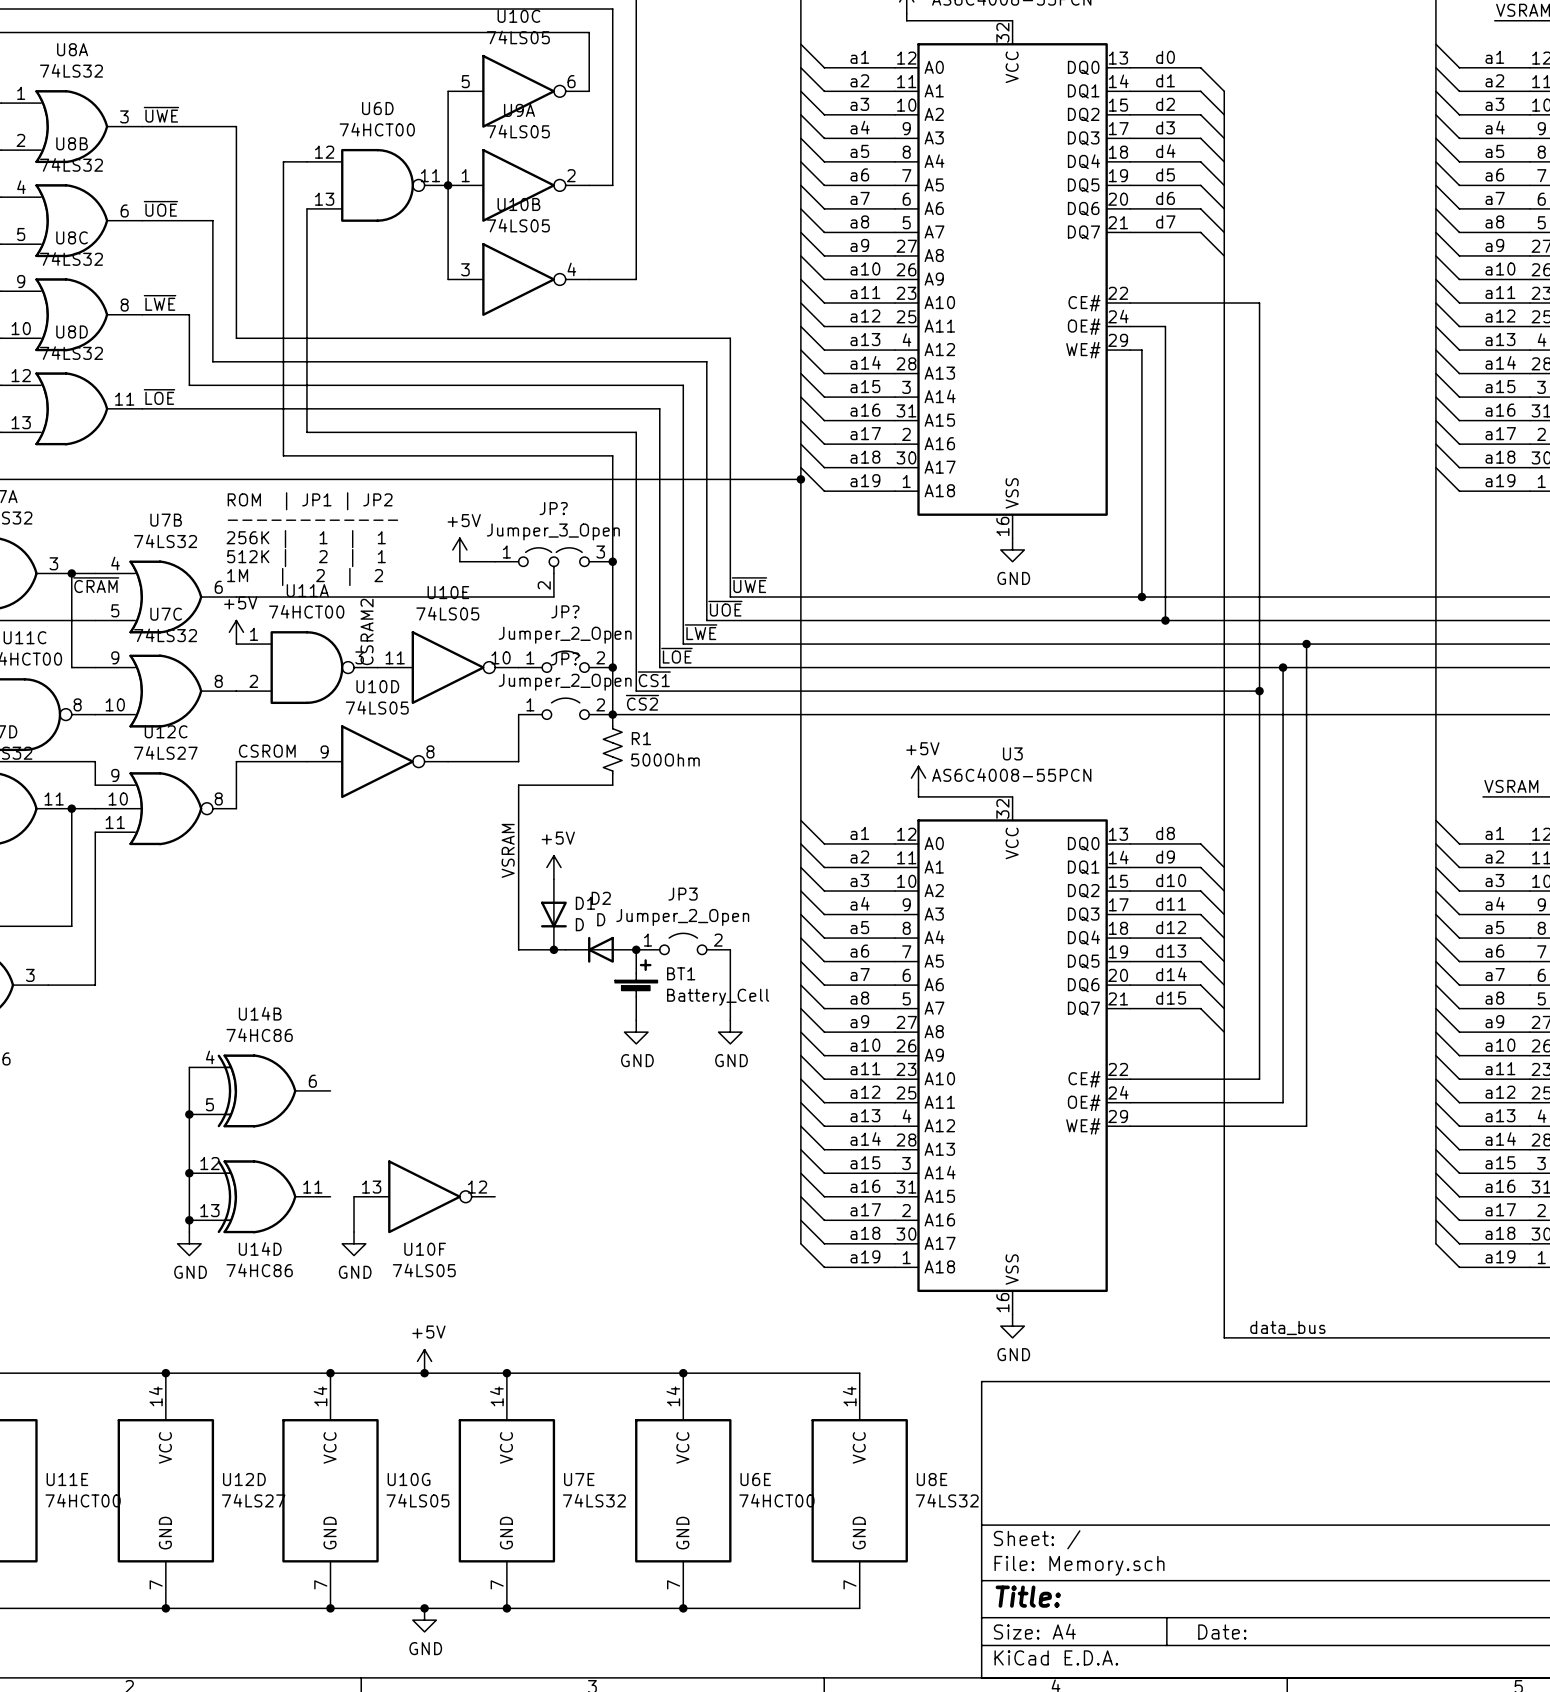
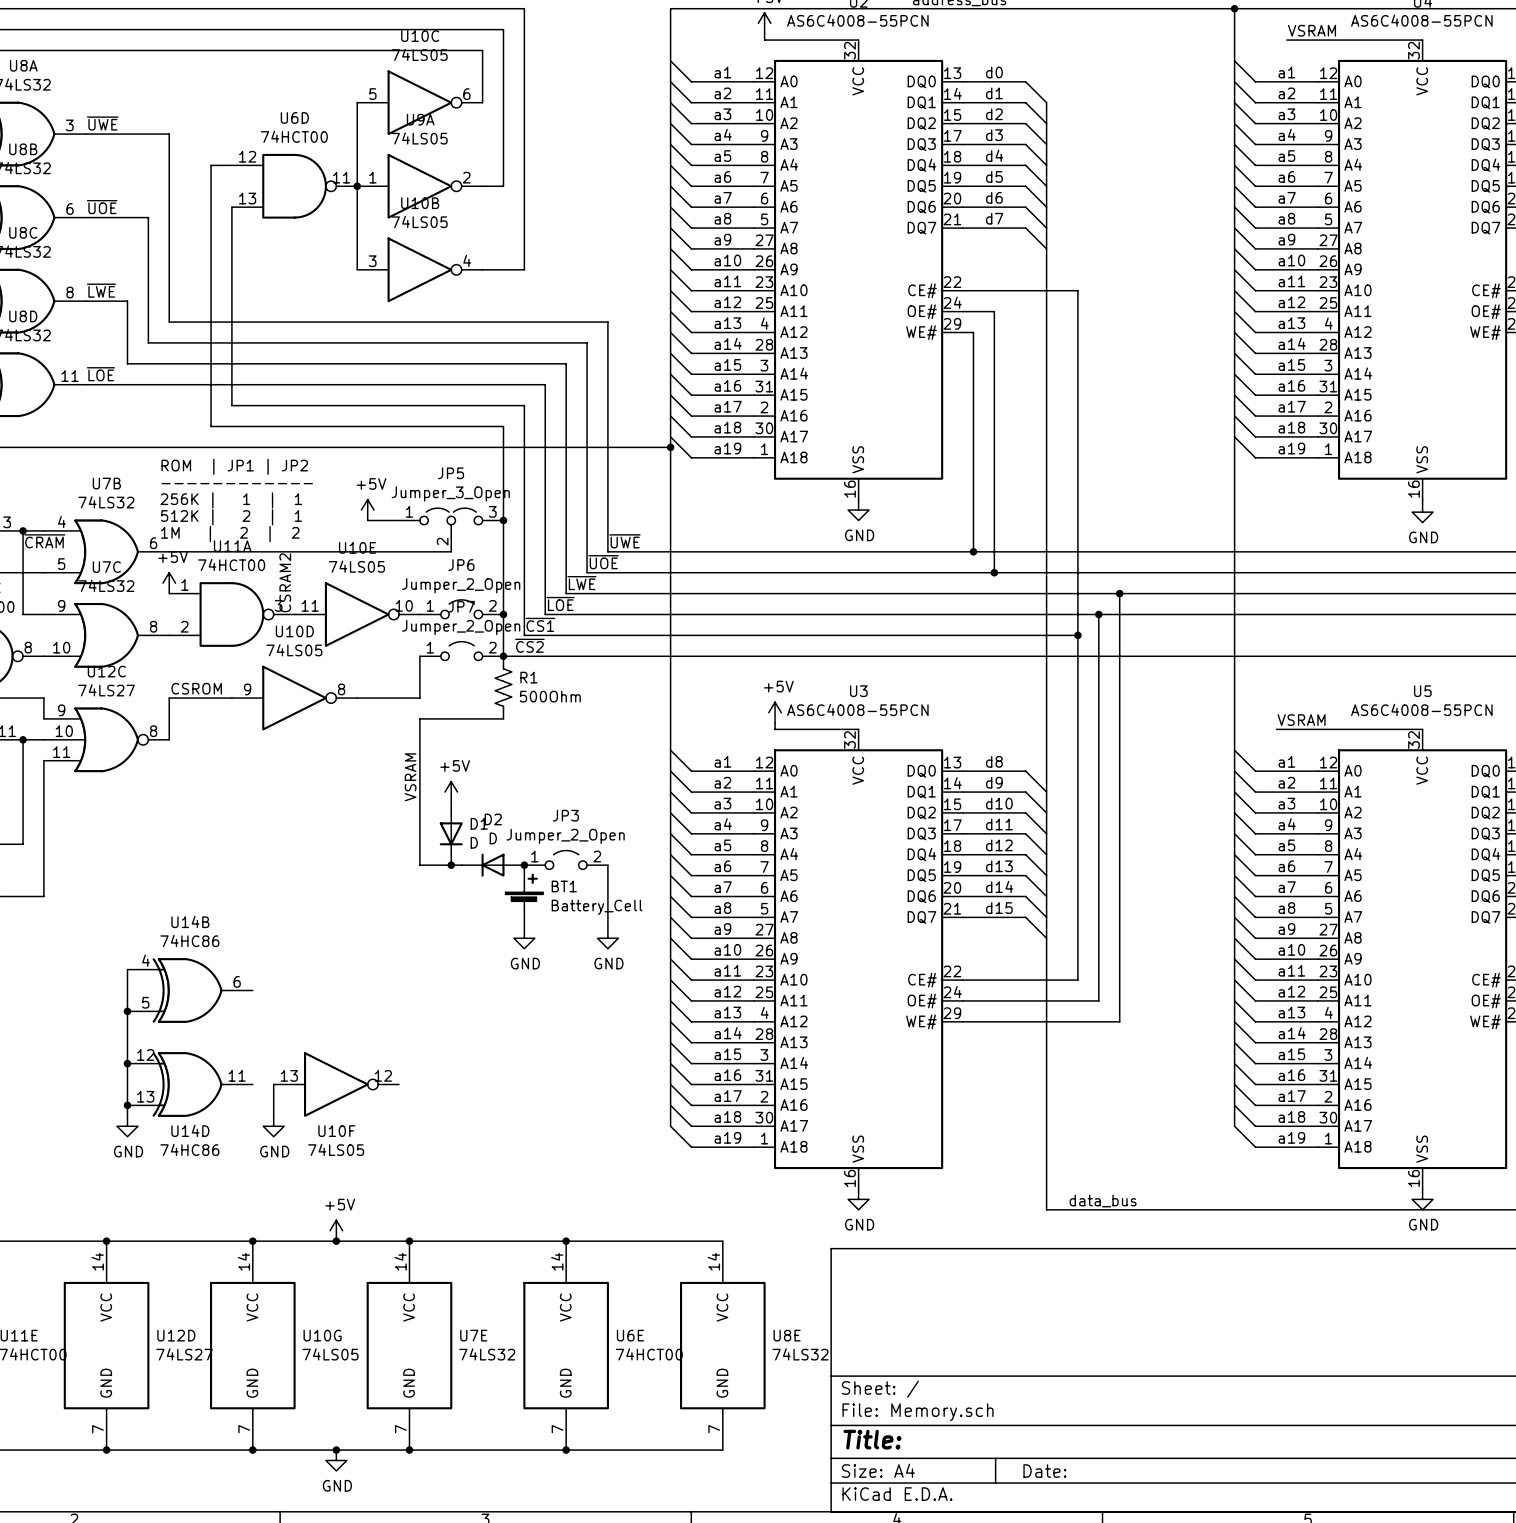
JP? name: JP? (553, 508) -> JP5 (451, 473)
JP? name: JP? (565, 611) -> JP6 (461, 565)
JP? name: JP? (565, 658) -> JP7 (461, 606)

